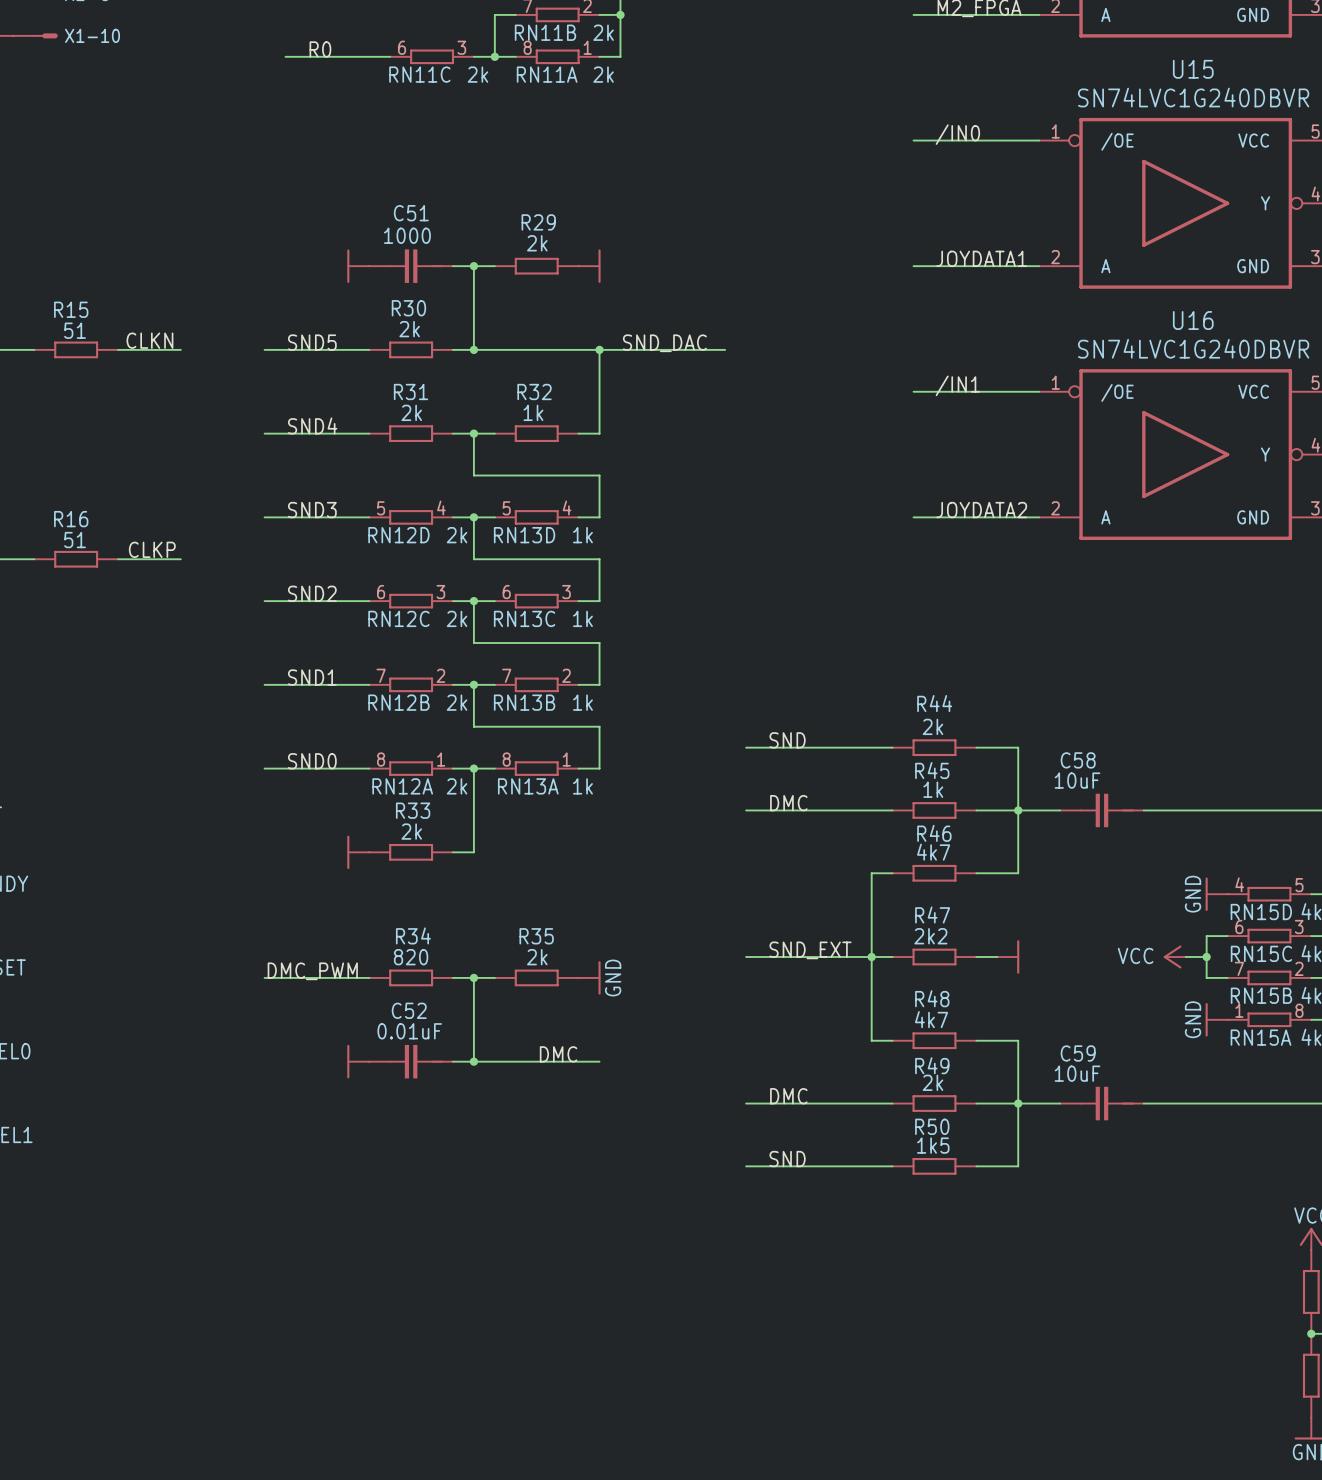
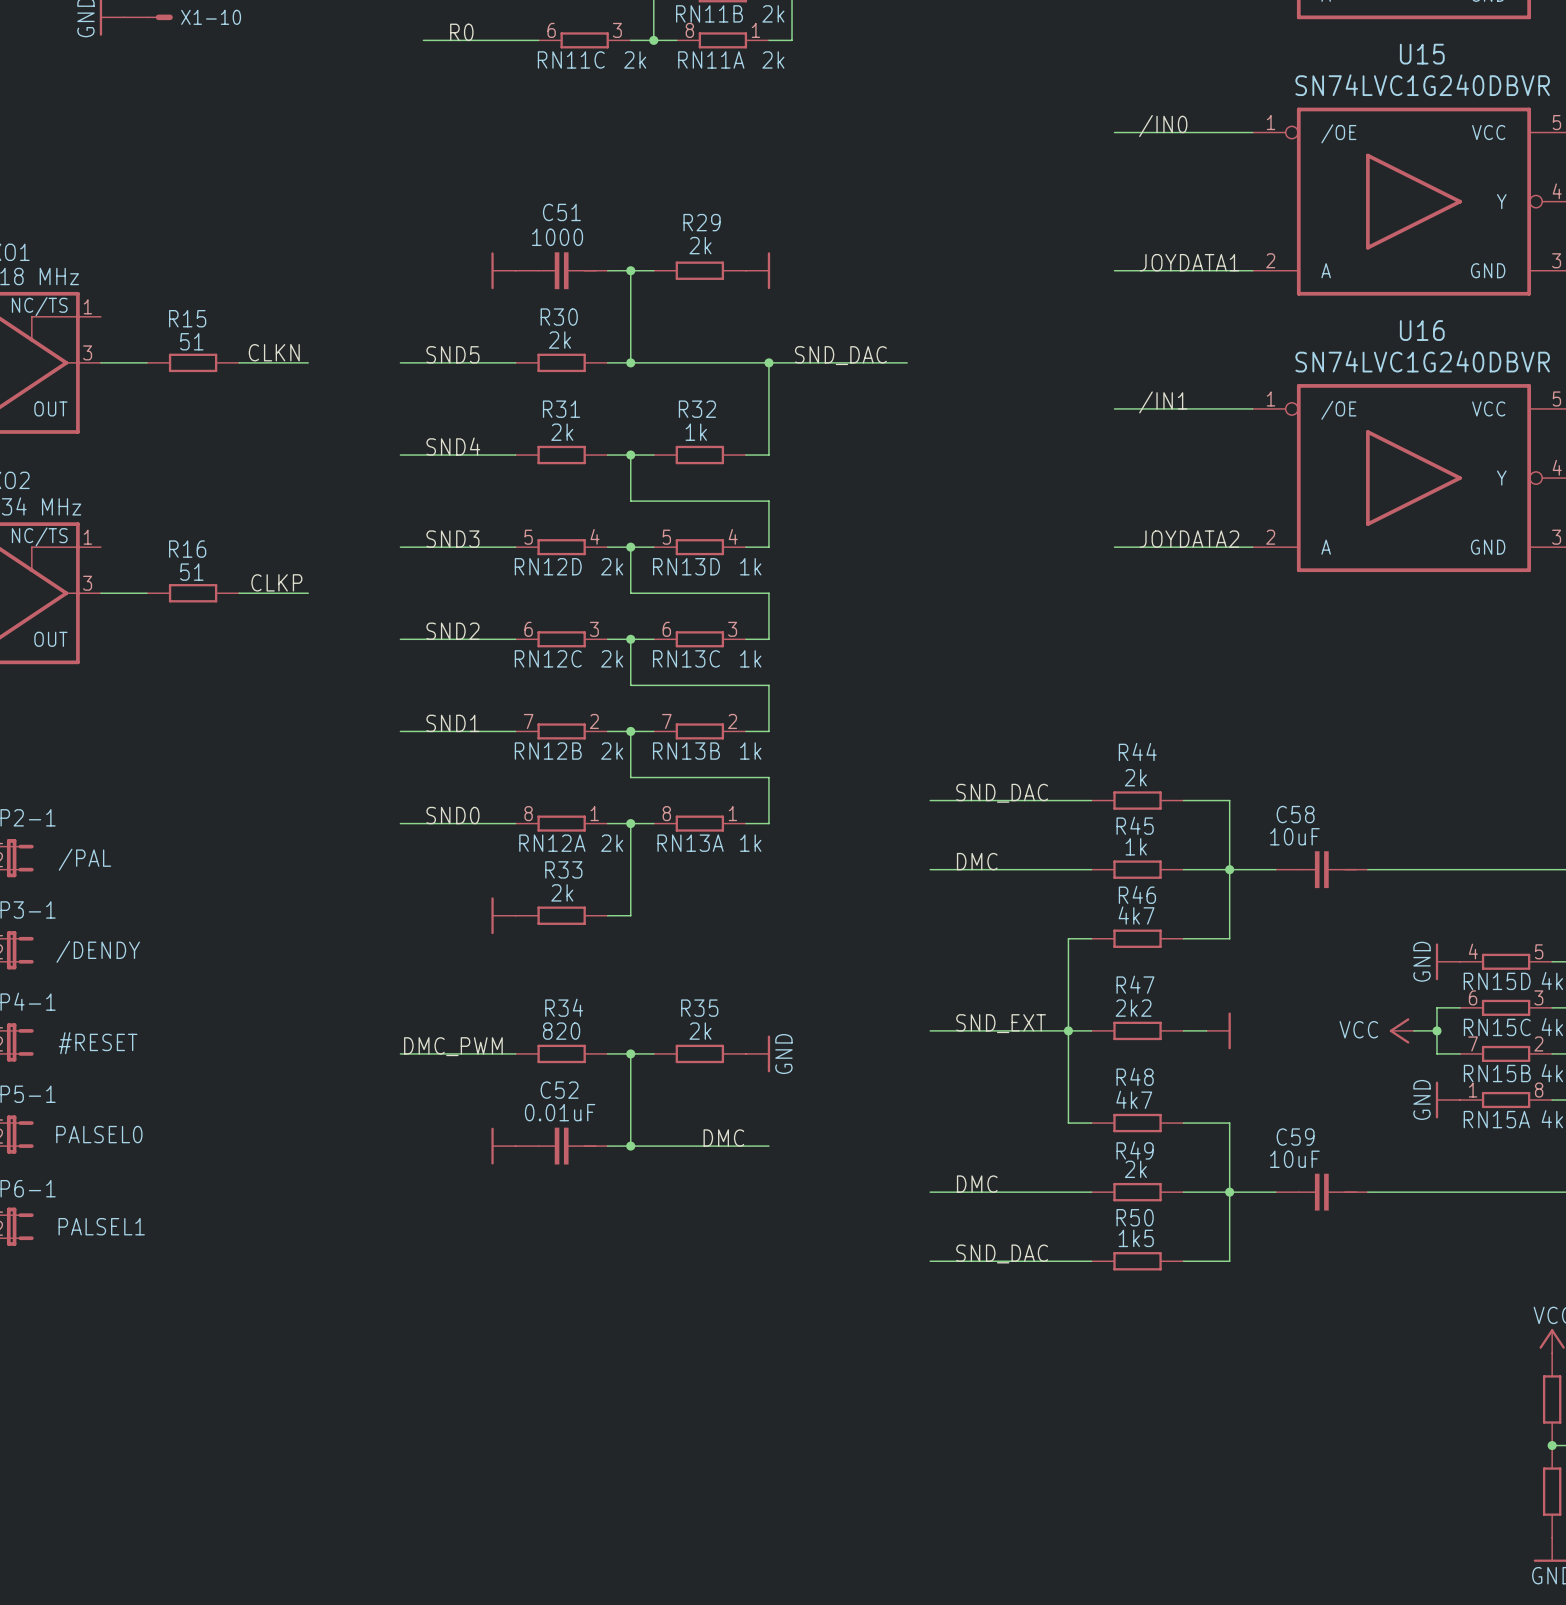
label: SND (787, 740) -> SND_DAC (1002, 793)
label: SND (787, 1159) -> SND_DAC (1002, 1253)

